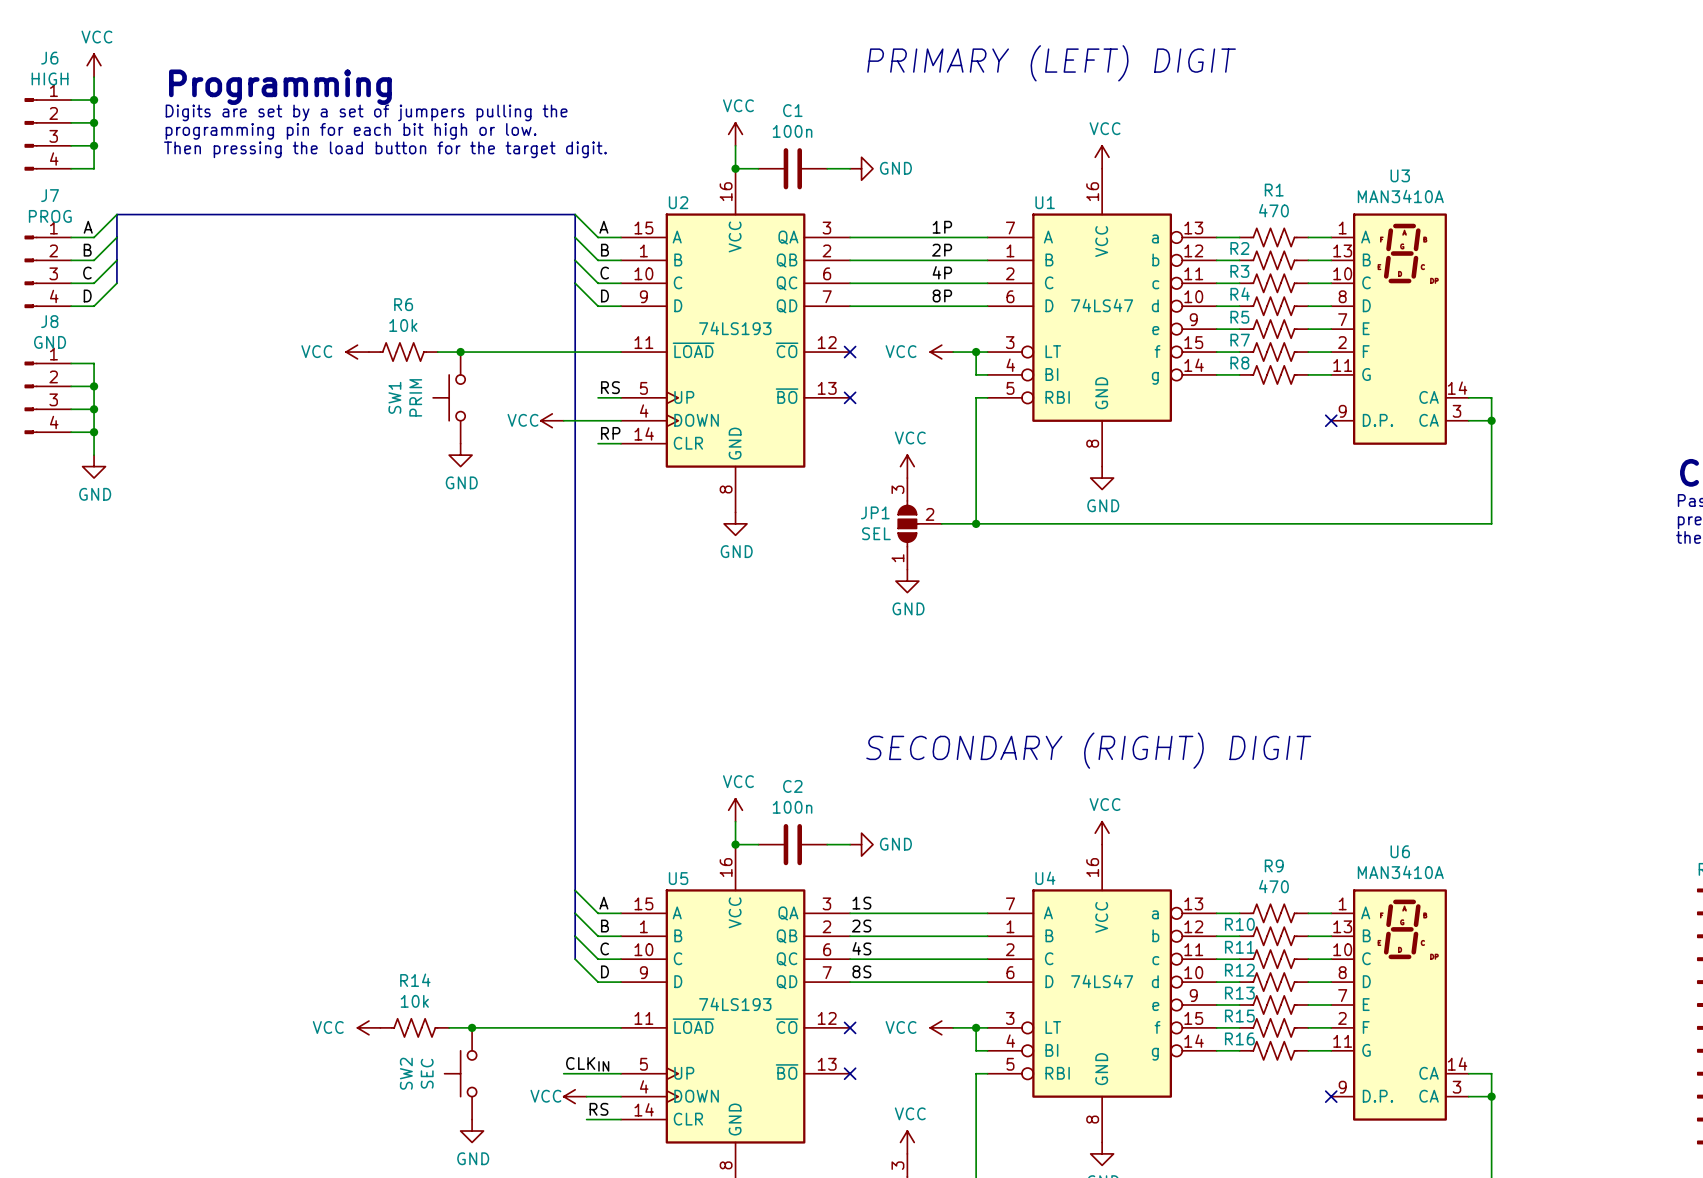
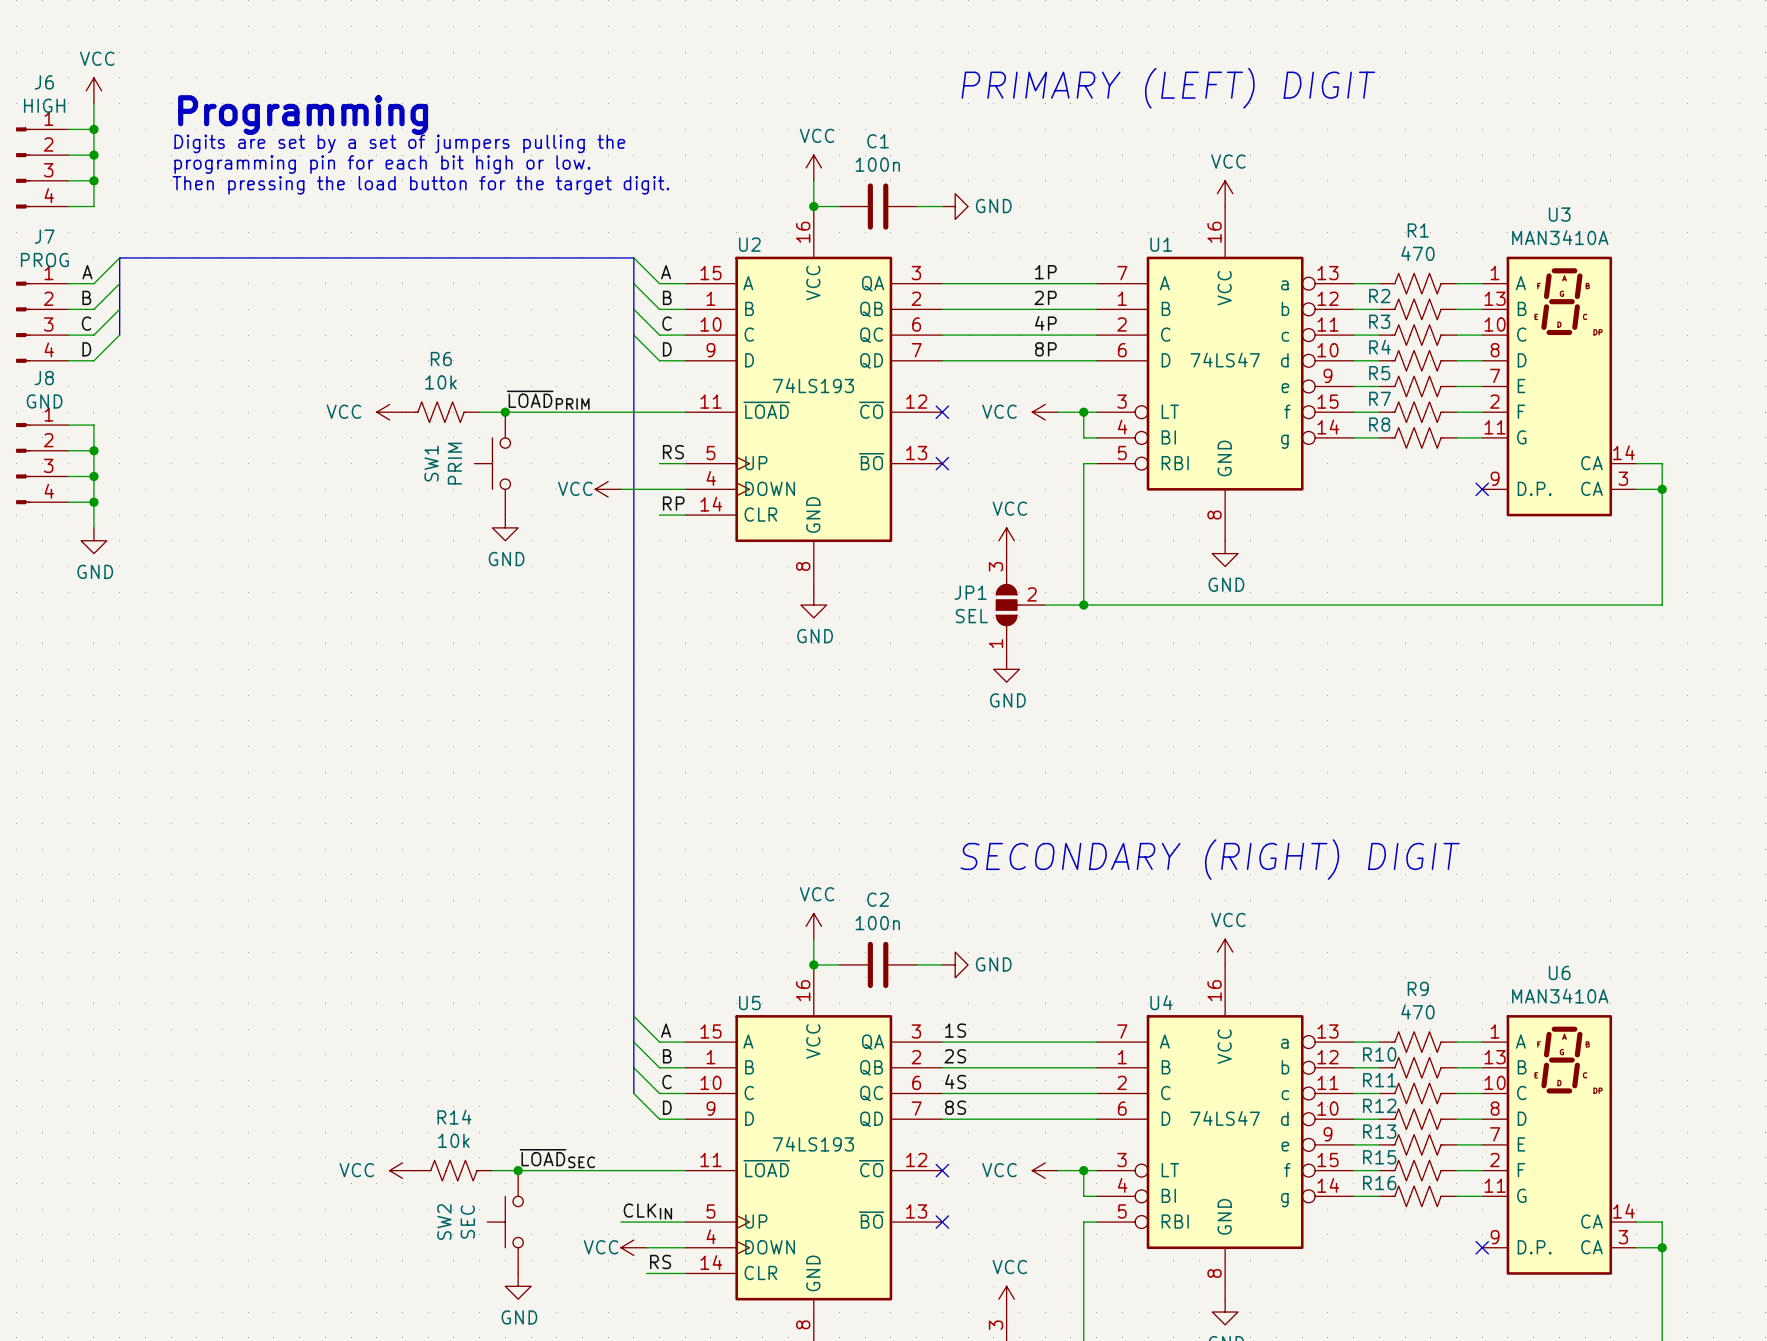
label: none -> ~{LOAD}PRIM (548, 400)
label: none -> ~{LOAD}SEC (557, 1158)

